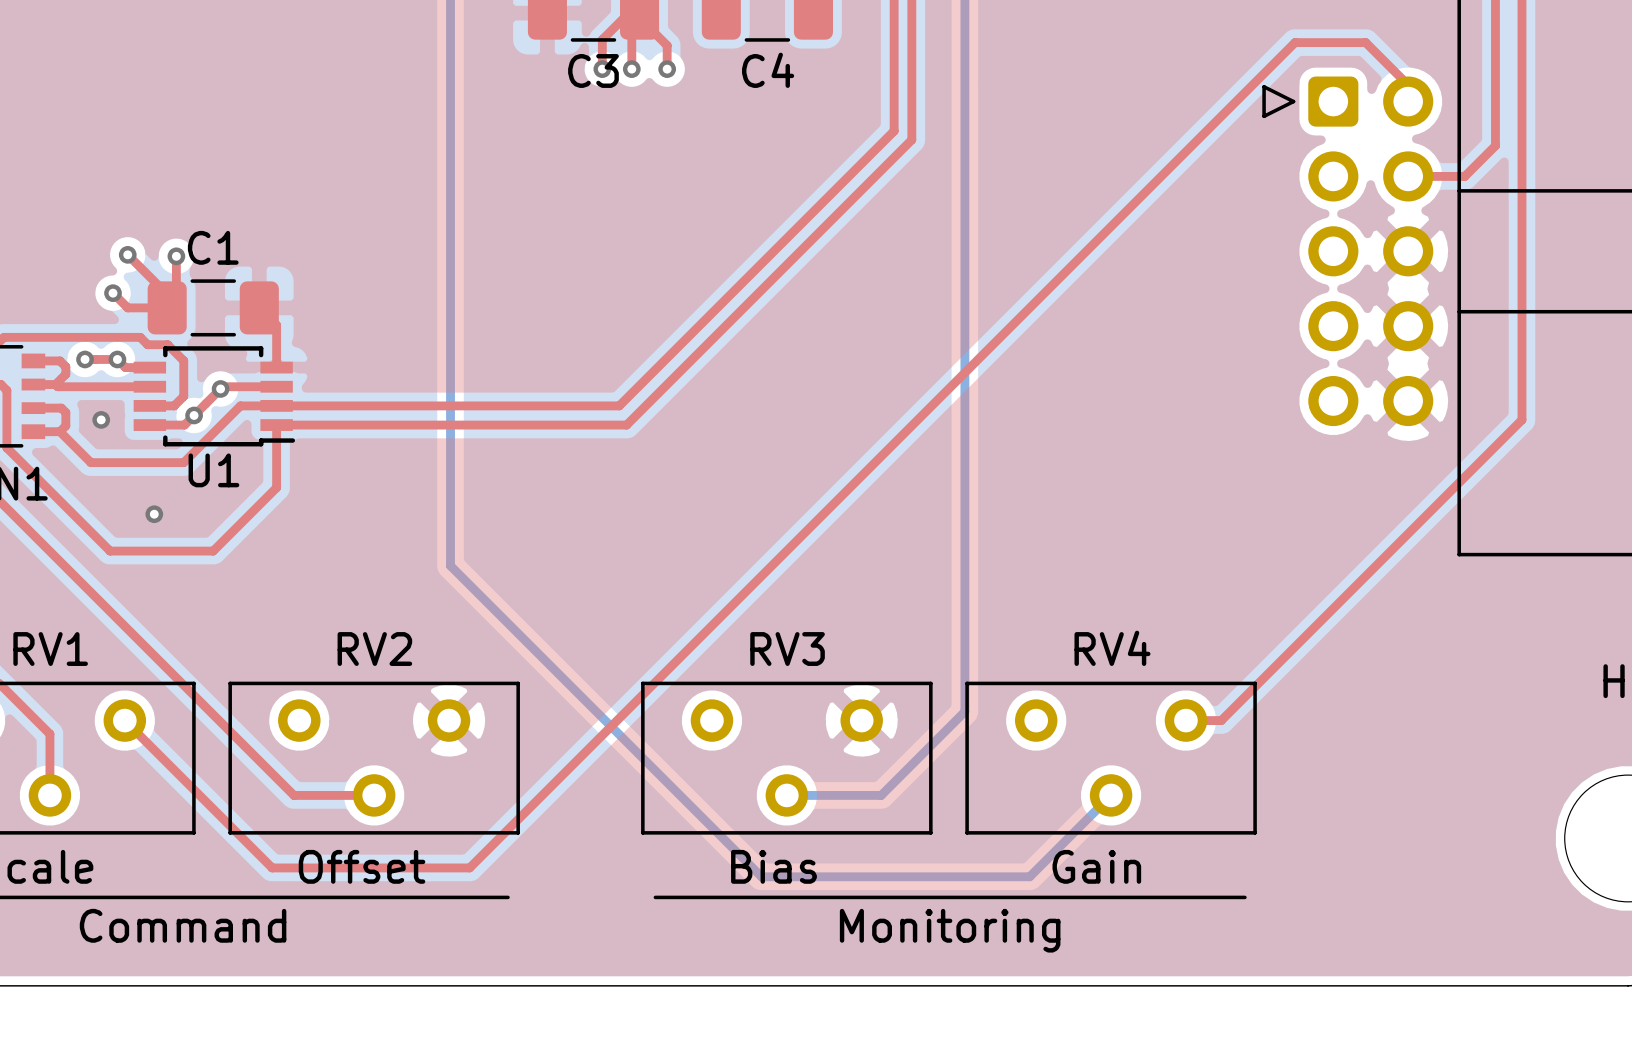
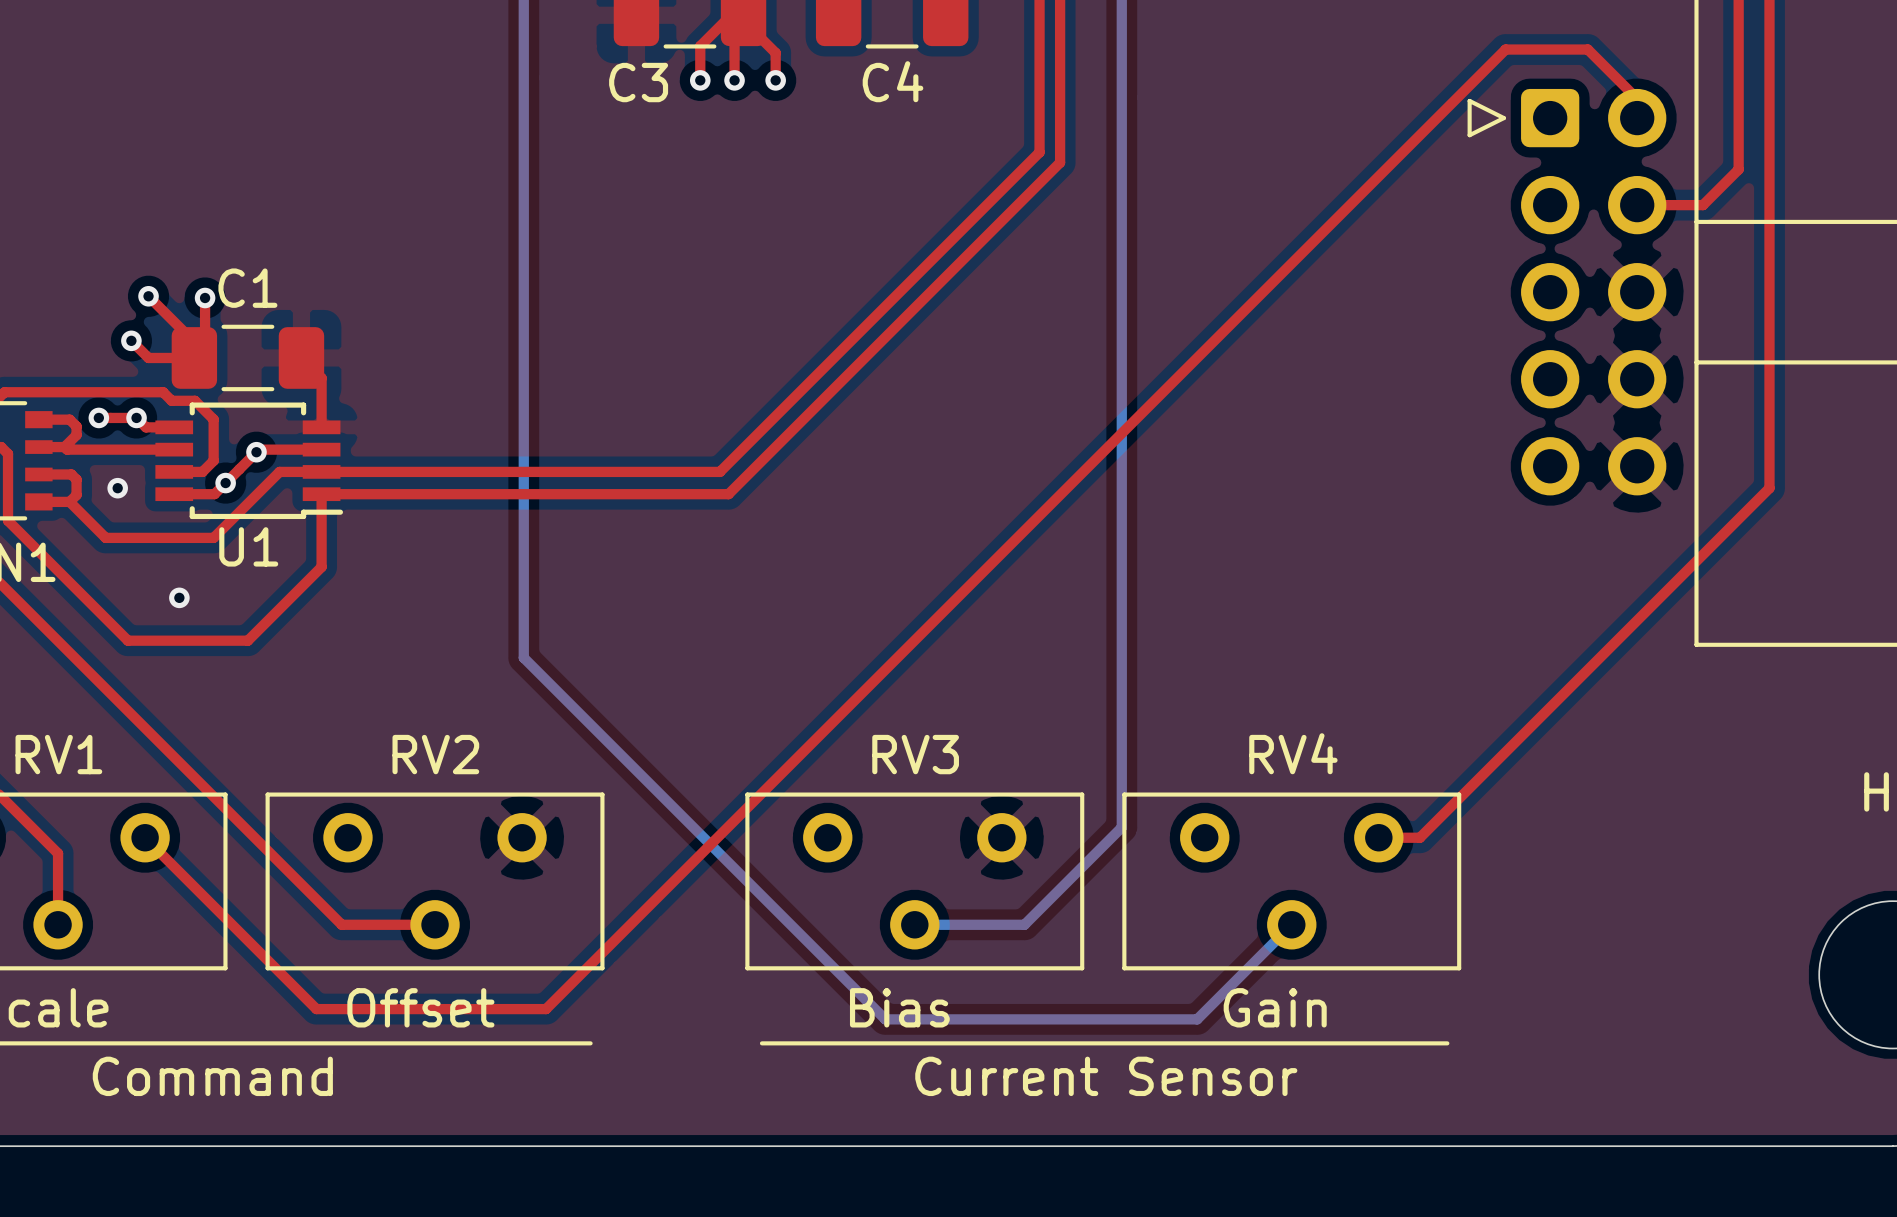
C3 name position: C3 (593, 70) -> C3 (638, 82)
text: Monitoring (950, 930) -> Current Sensor (1106, 1076)

